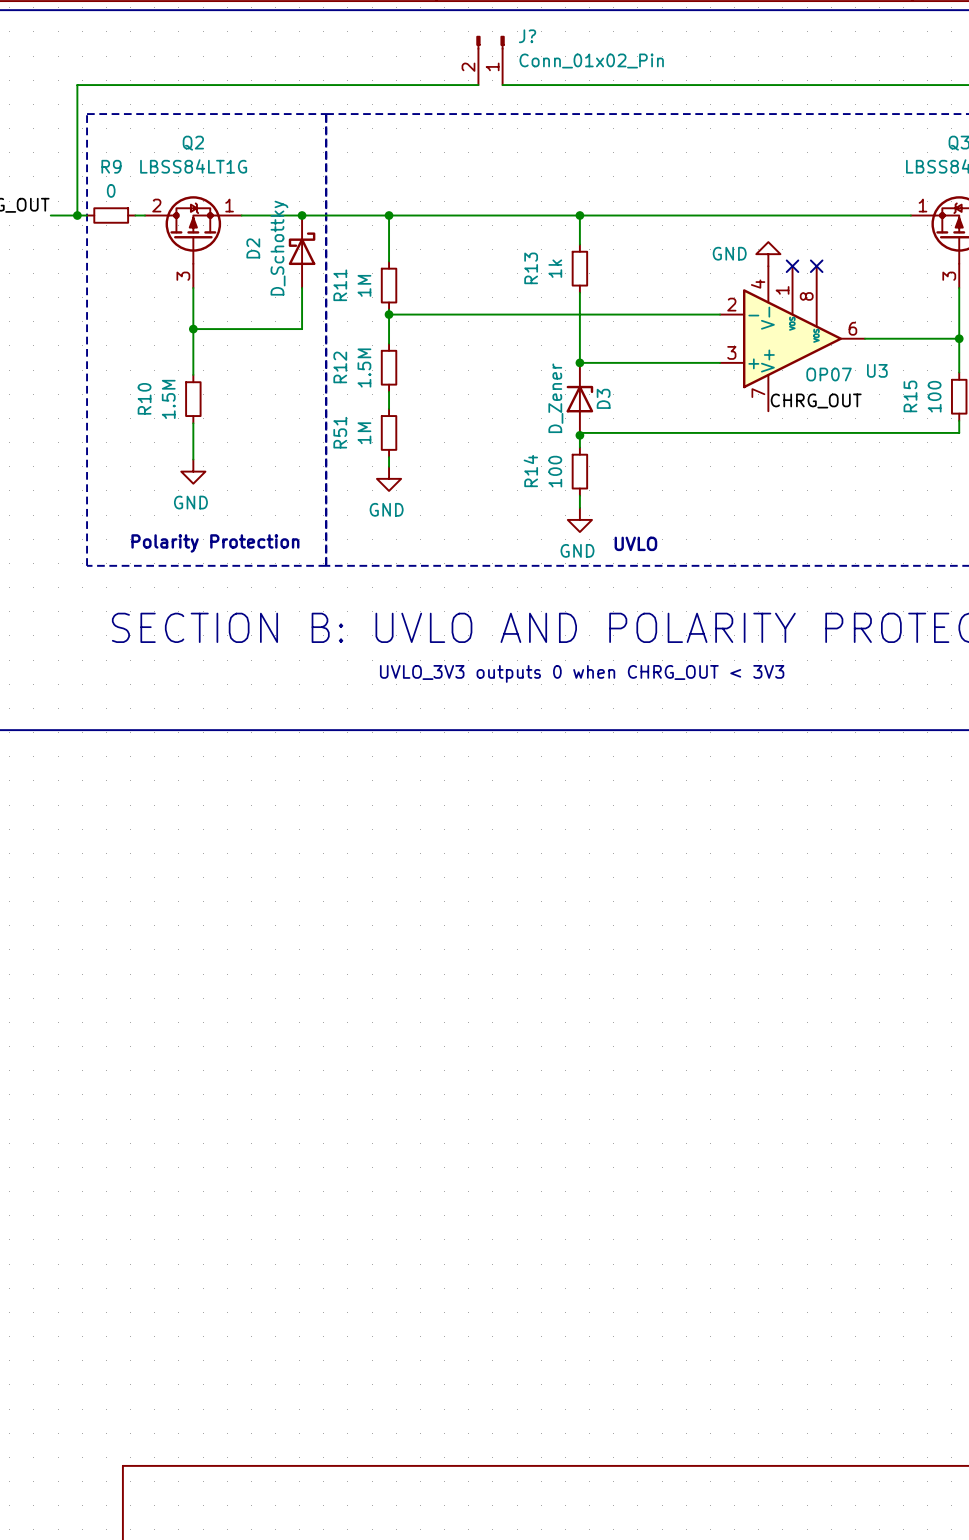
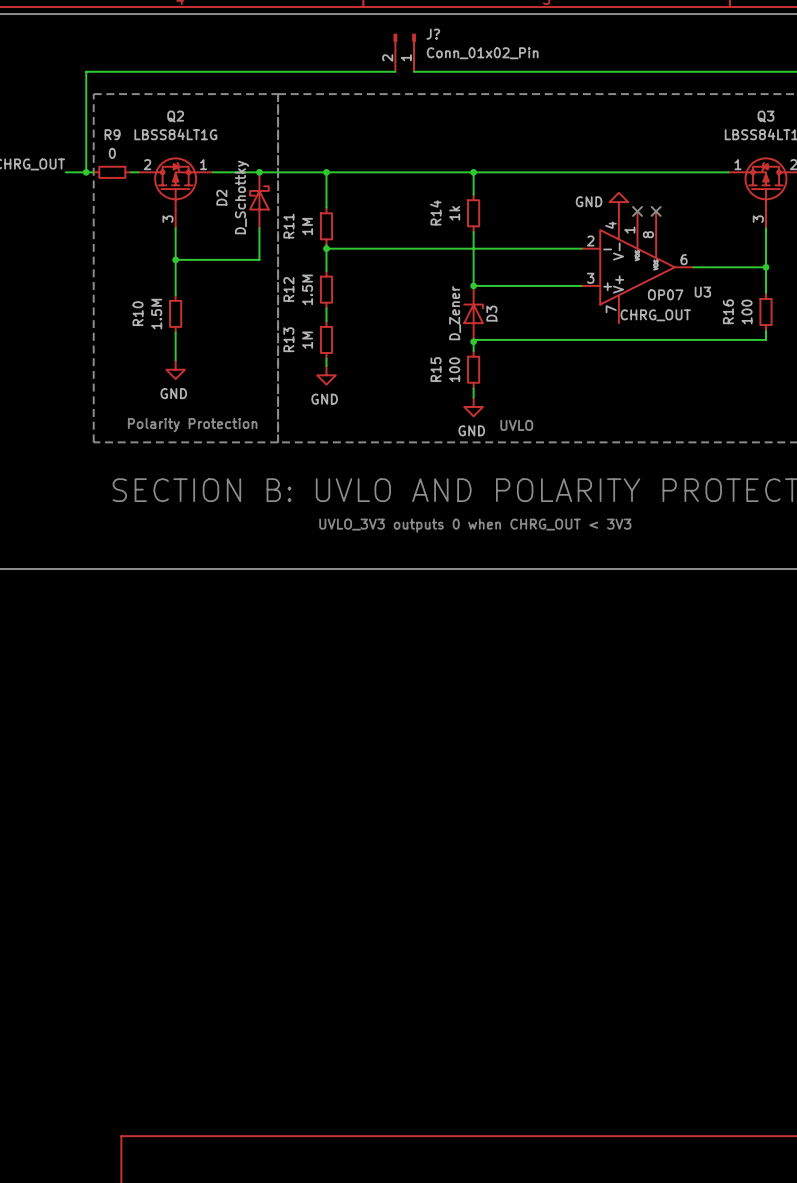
R13 name: R13 (531, 268) -> R14 (435, 212)
R15 name: R15 (910, 396) -> R16 (728, 311)
R51 name: R51 (340, 432) -> R13 (288, 339)
R14 name: R14 (530, 471) -> R15 (436, 369)

